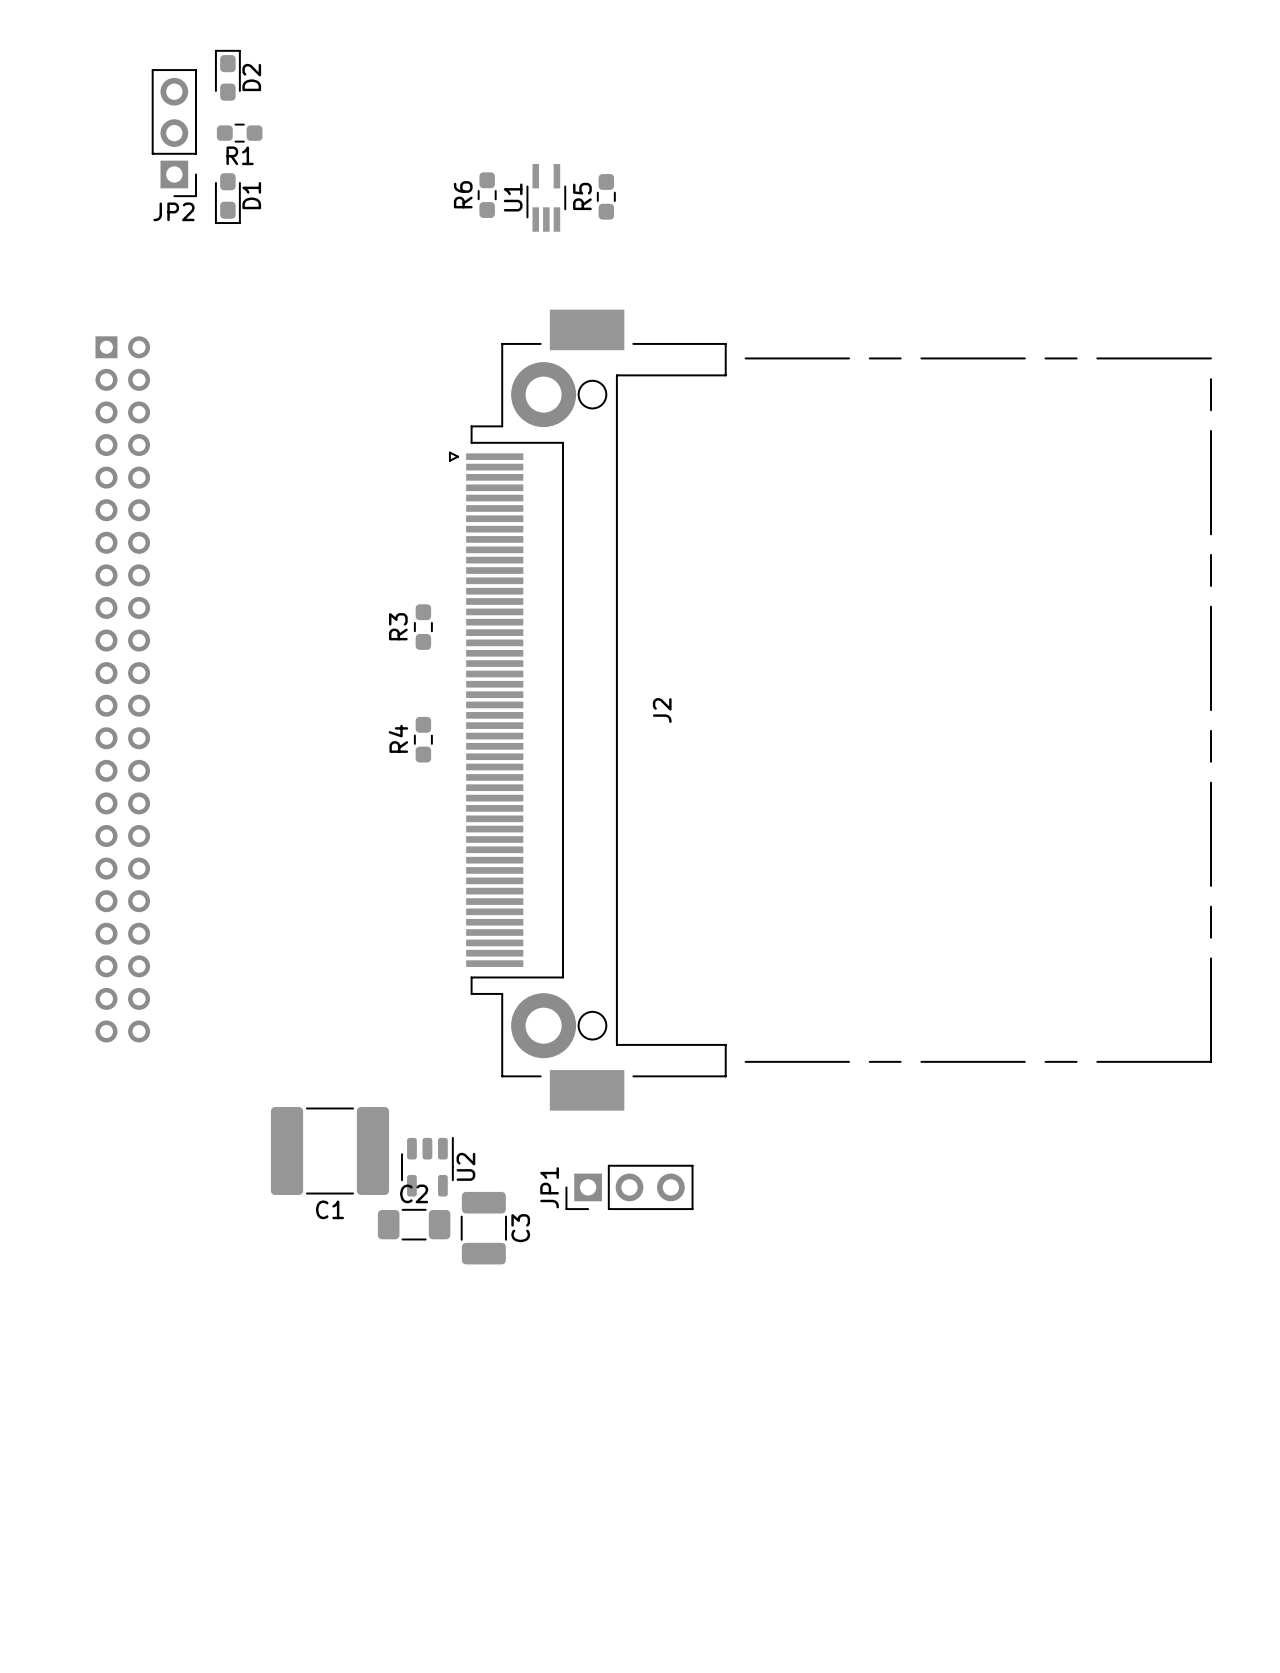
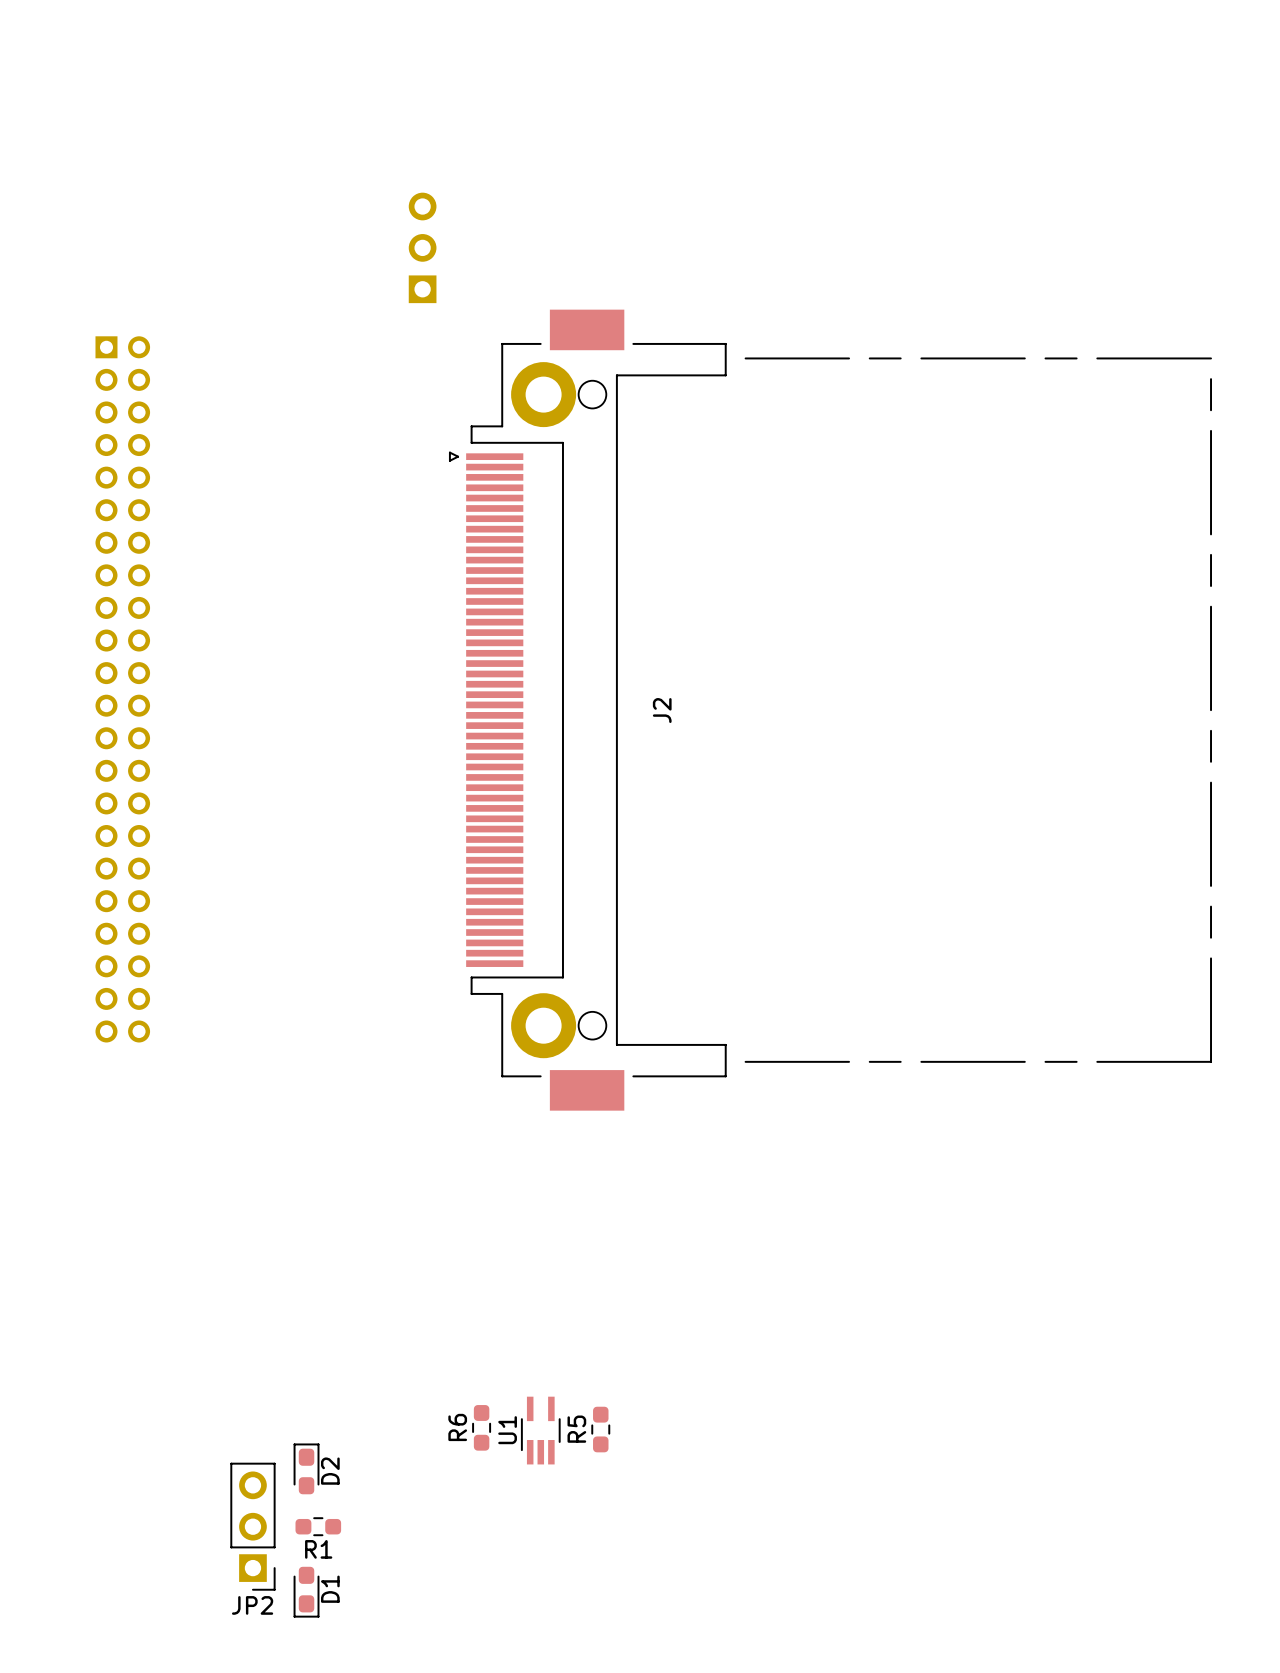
D2 position: (227, 75) -> (306, 1468)
JP2 position: (174, 133) -> (252, 1526)
R1 position: (239, 133) -> (318, 1526)
R6 position: (487, 195) -> (481, 1427)
R5 position: (606, 196) -> (600, 1429)
U1 position: (546, 197) -> (540, 1430)
D1 position: (227, 198) -> (306, 1592)
part: none -> (422, 247)
R3: (423, 627) -> none
R4: (423, 739) -> none
C1: (329, 1151) -> none
U2: (427, 1166) -> none
JP1: (629, 1187) -> none
C2: (414, 1224) -> none
C3: (483, 1228) -> none

